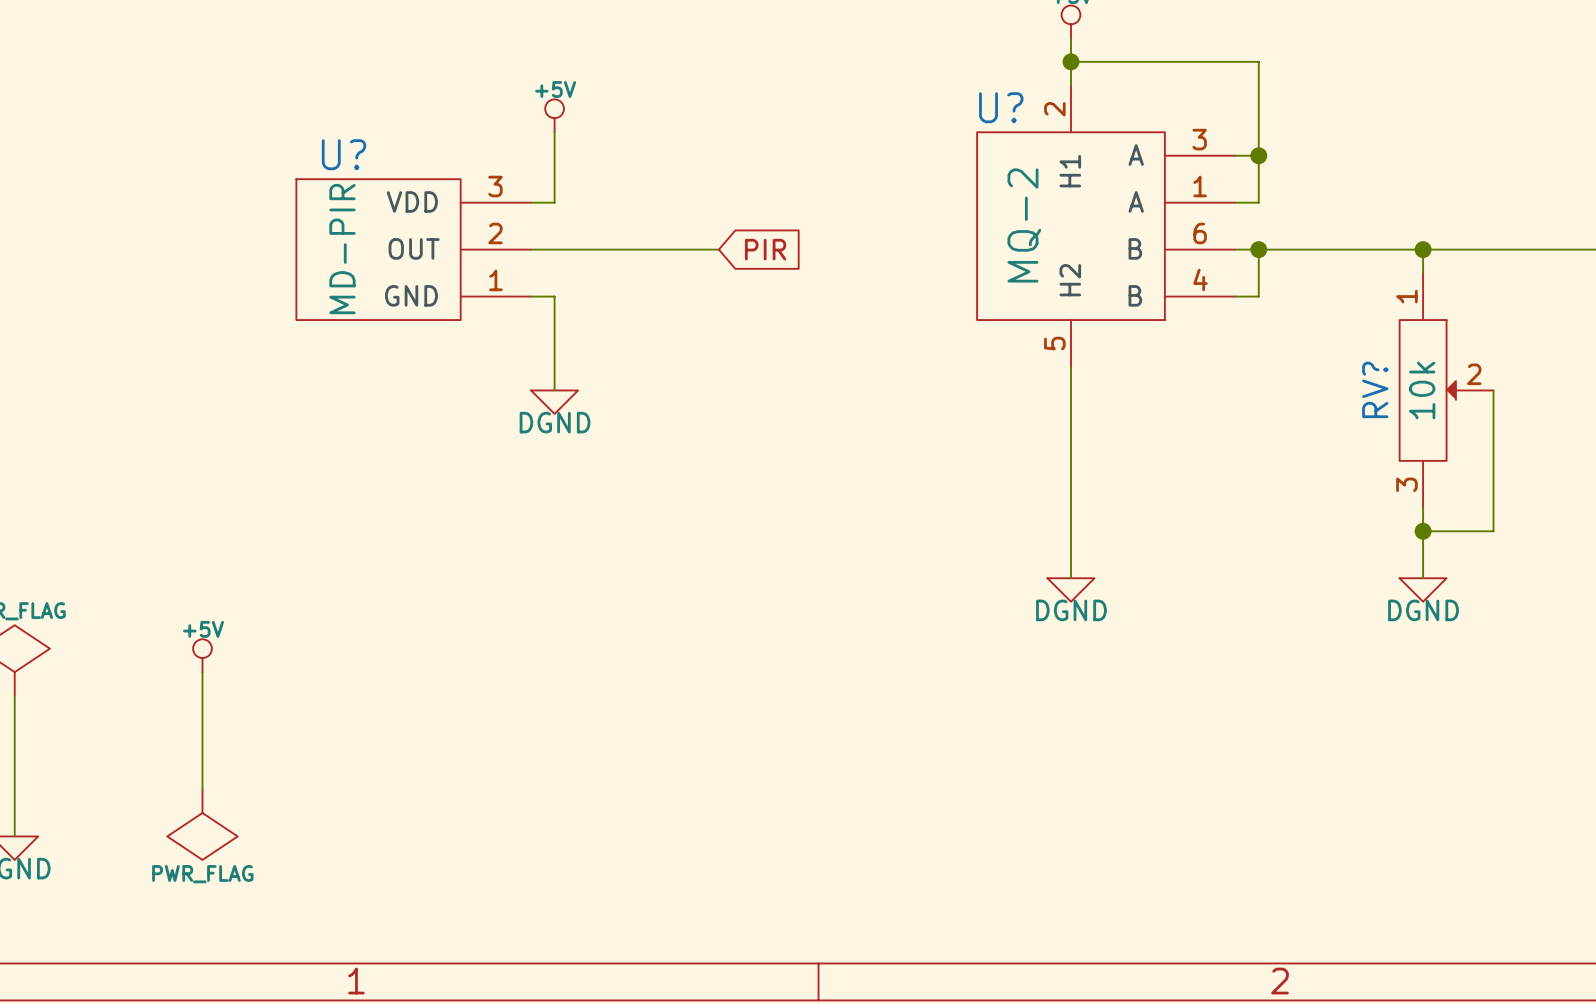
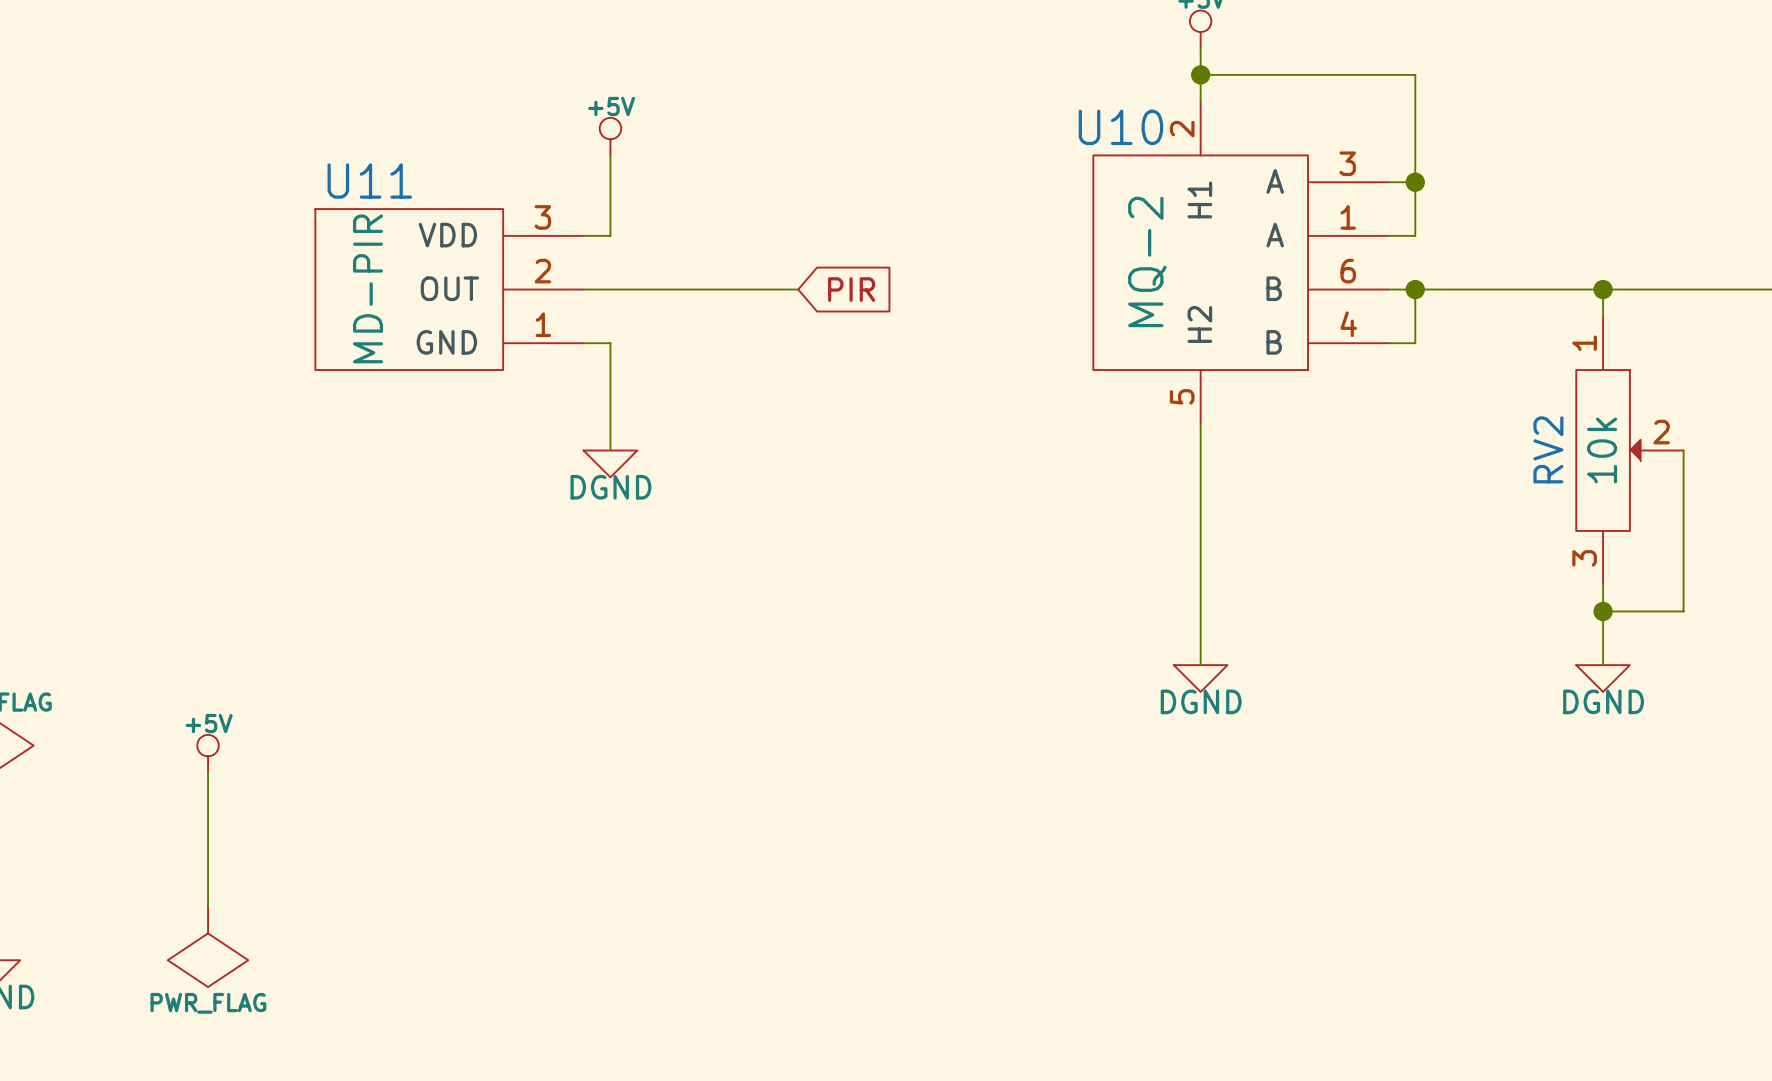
U? name: U? (1001, 107) -> U10 (1120, 127)
U? name: U? (344, 154) -> U11 (369, 181)
RV? name: RV? (1375, 389) -> RV2 (1548, 449)

